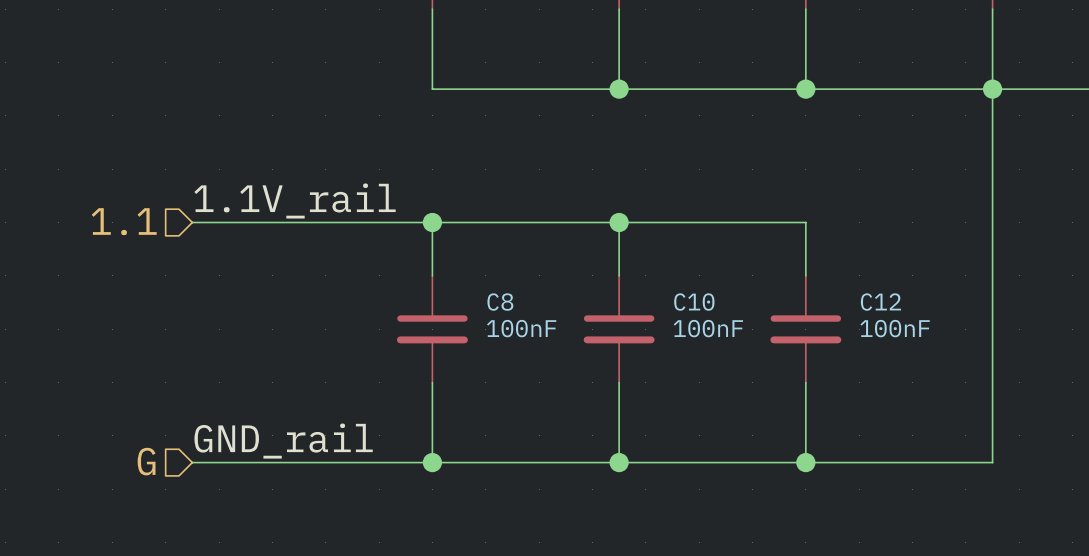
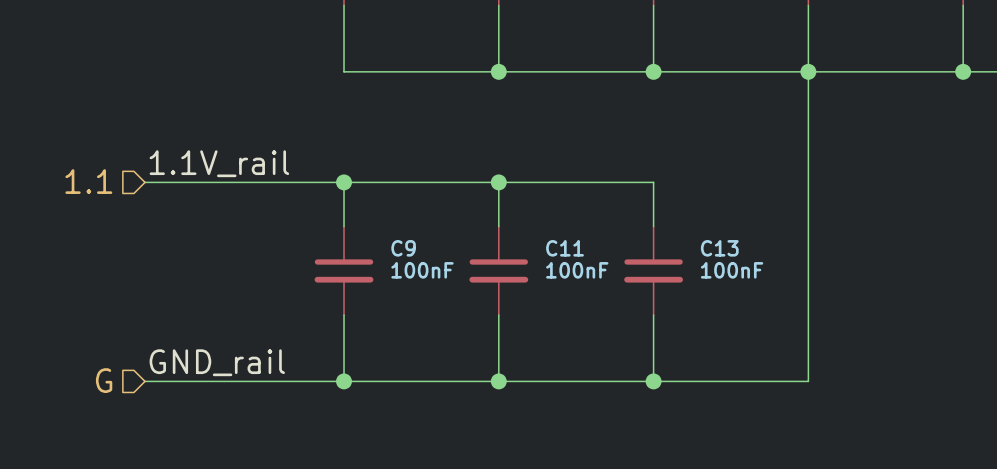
C8 name: C8 (500, 302) -> C9 (403, 248)
C10 name: C10 (694, 302) -> C11 (565, 248)
C12 name: C12 (880, 302) -> C13 (719, 248)

